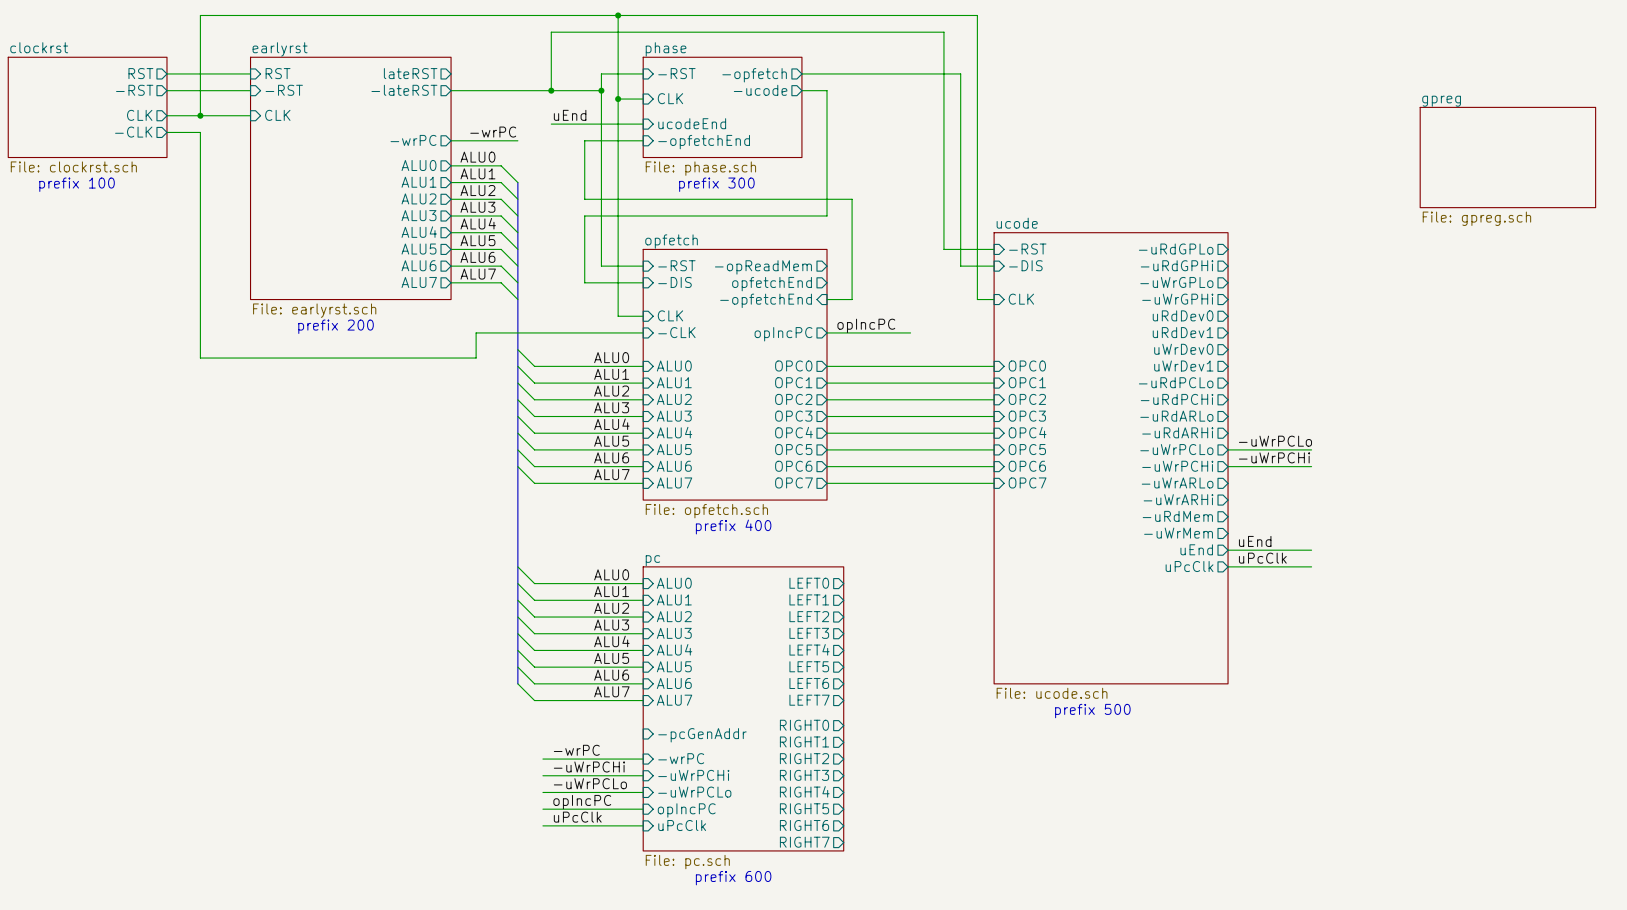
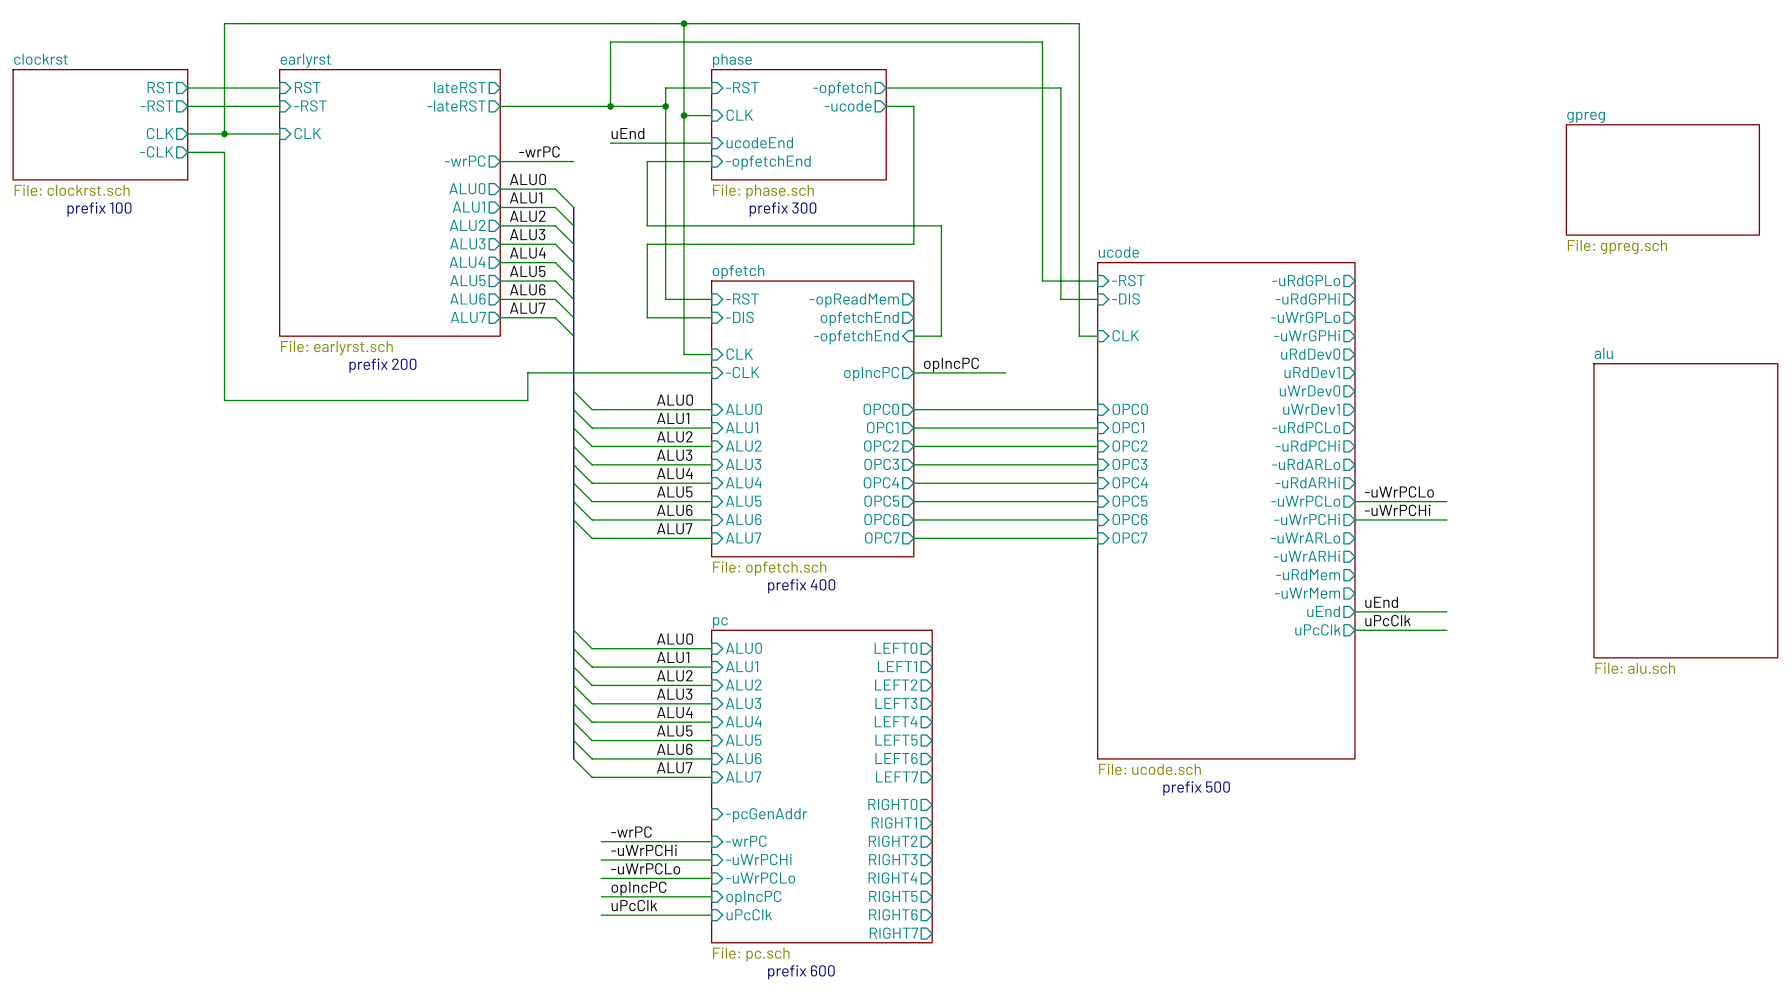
sheet alu: none -> File: alu.sch (1685, 510)

